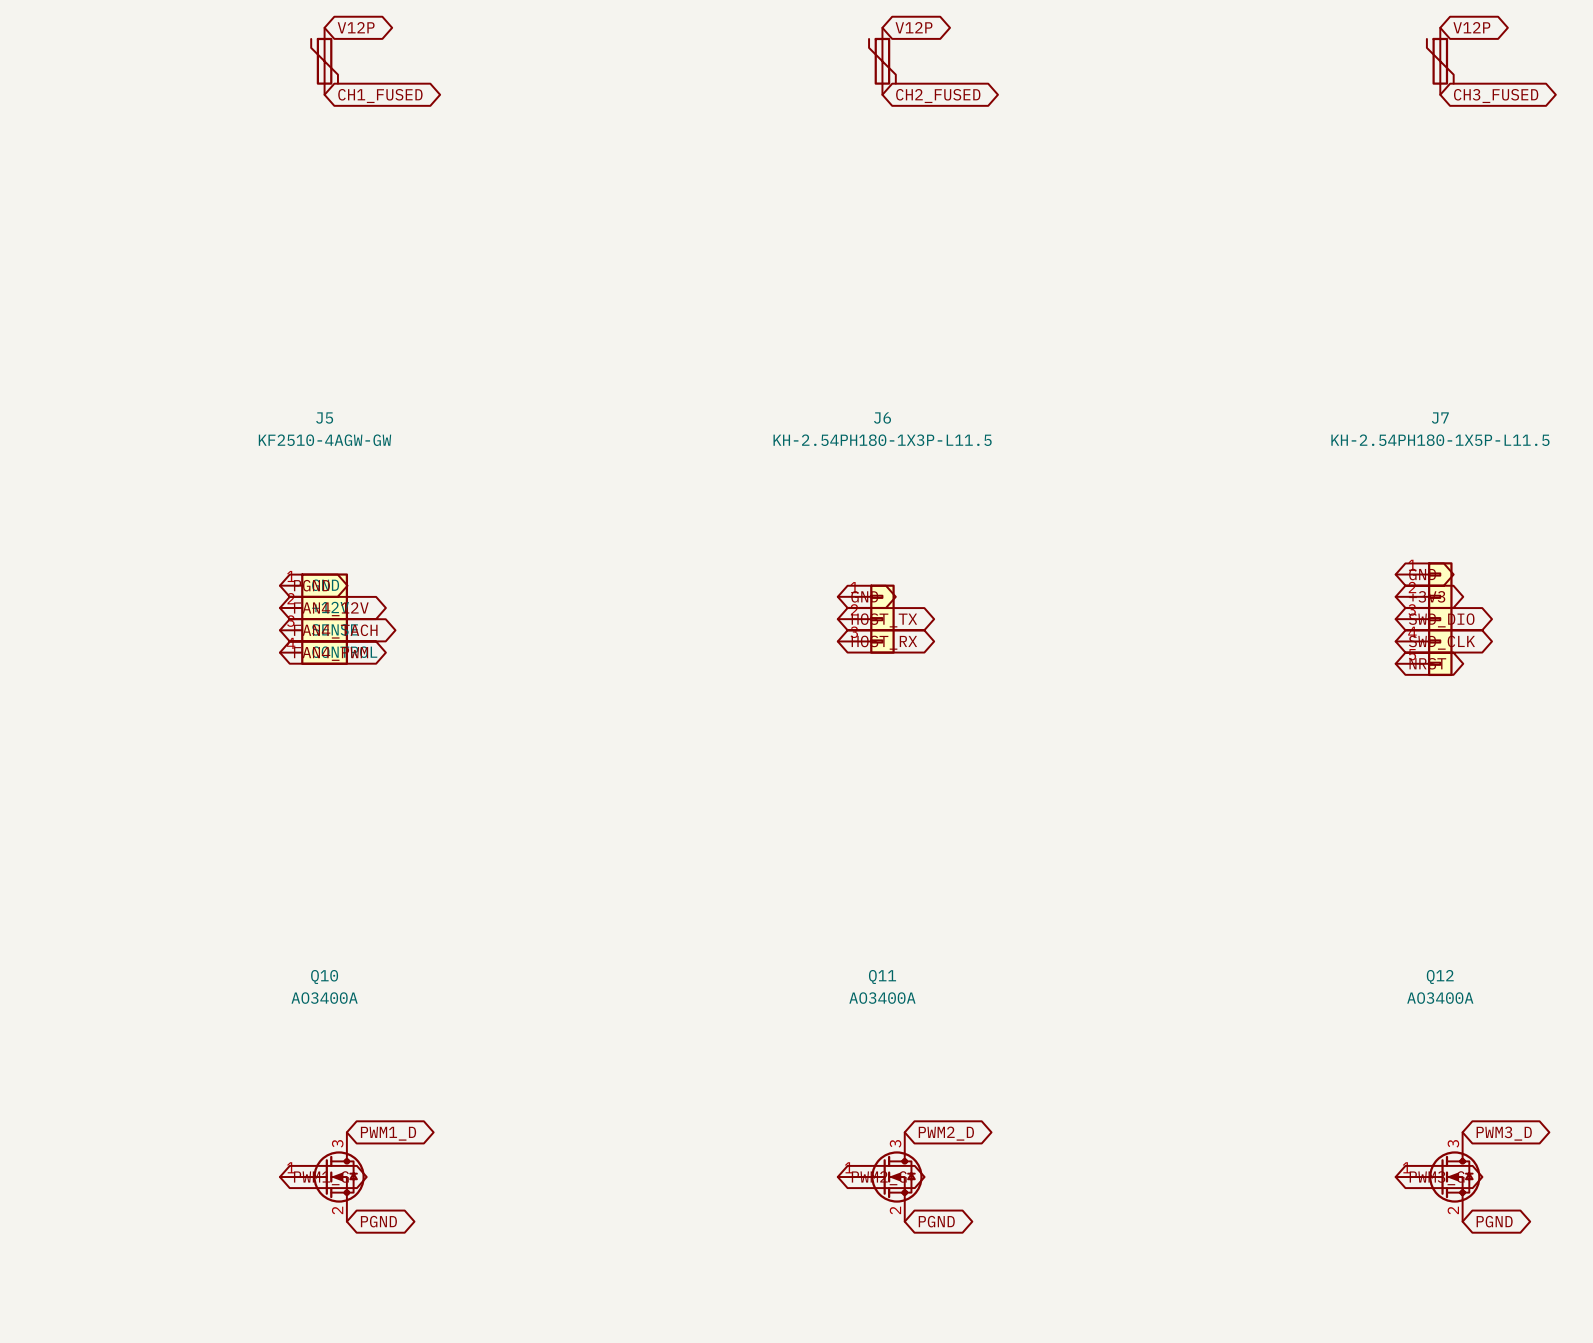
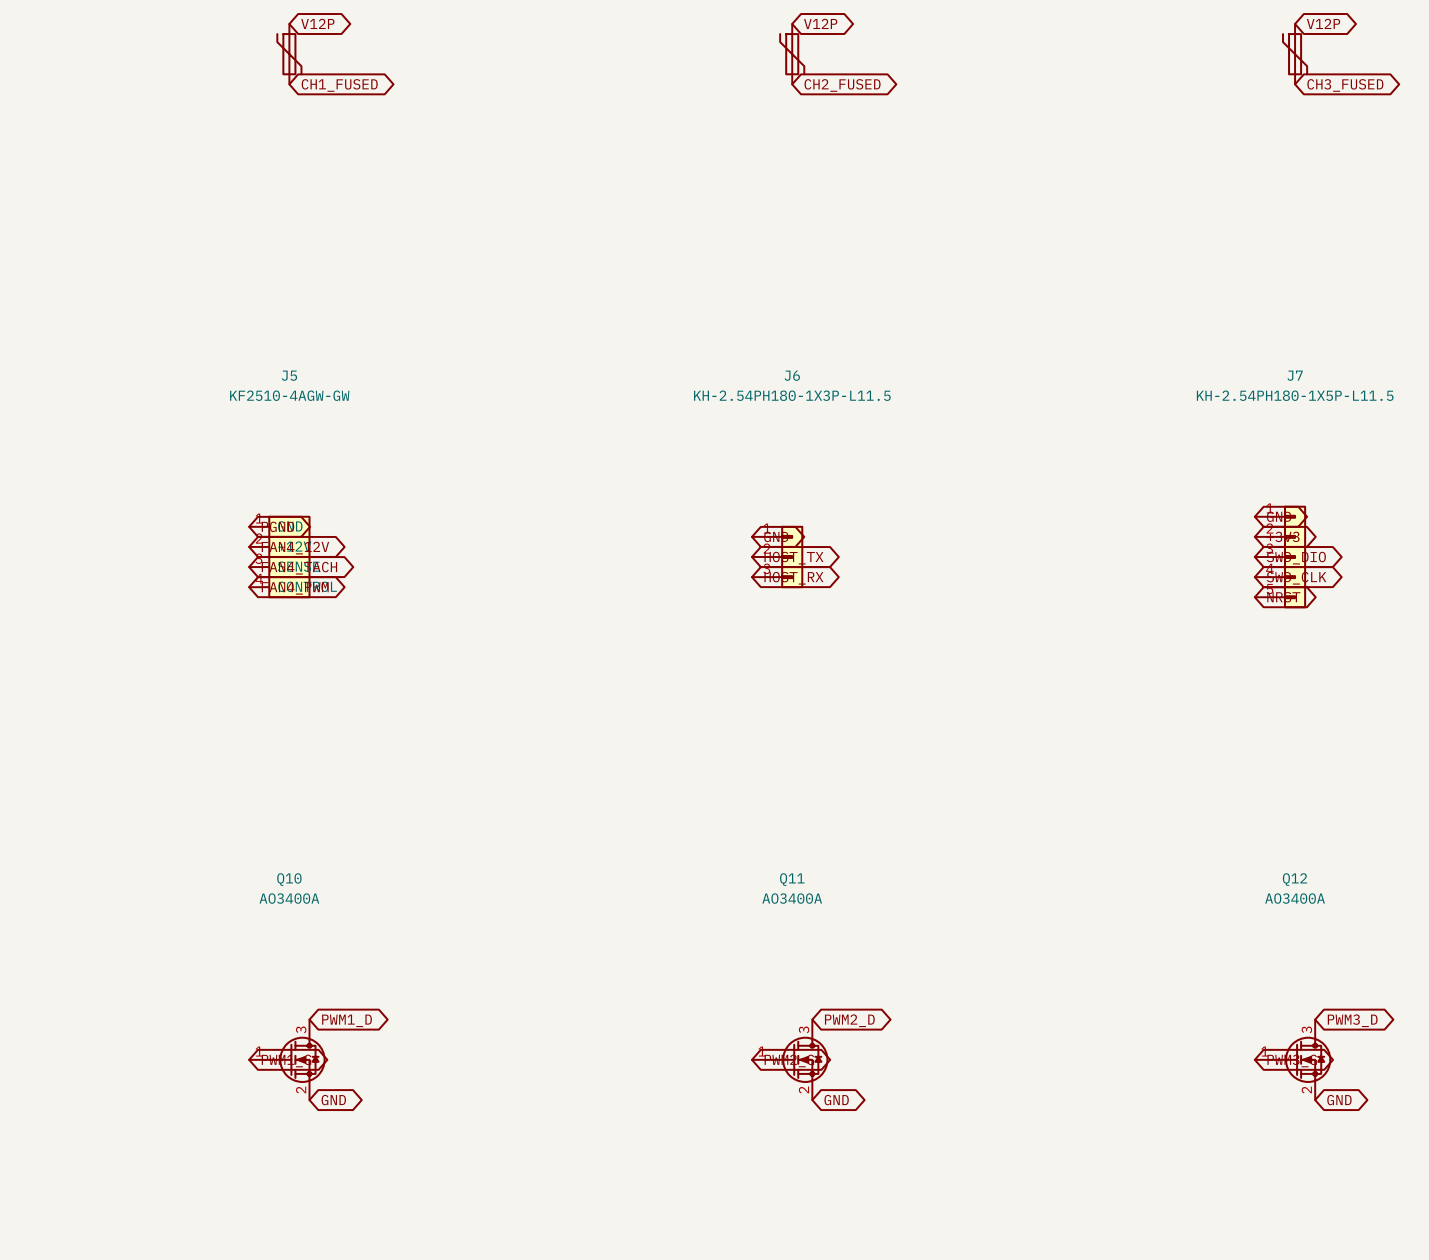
global label: PGND (378, 1221) -> GND (333, 1100)
global label: PGND (936, 1221) -> GND (836, 1100)
global label: PGND (1494, 1221) -> GND (1339, 1100)

